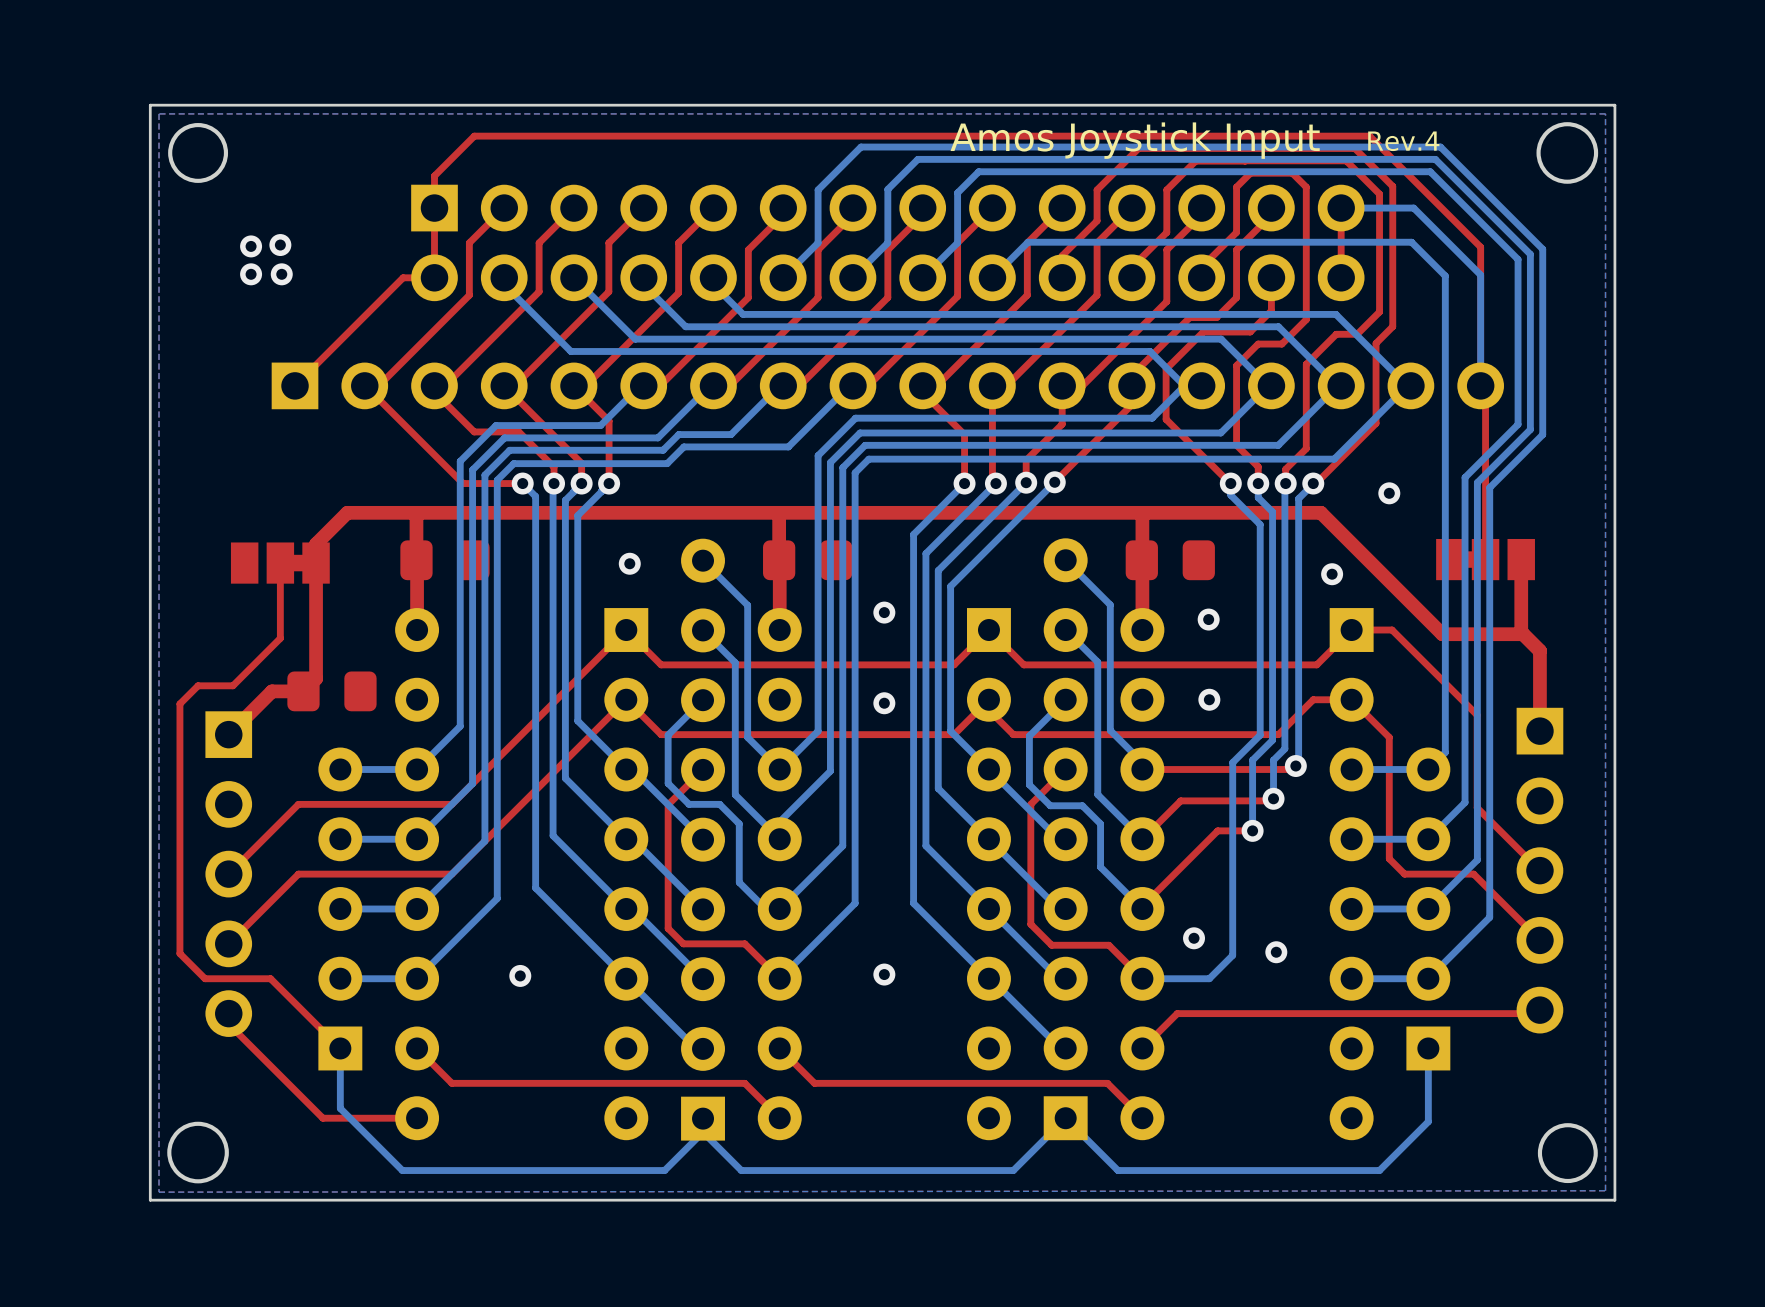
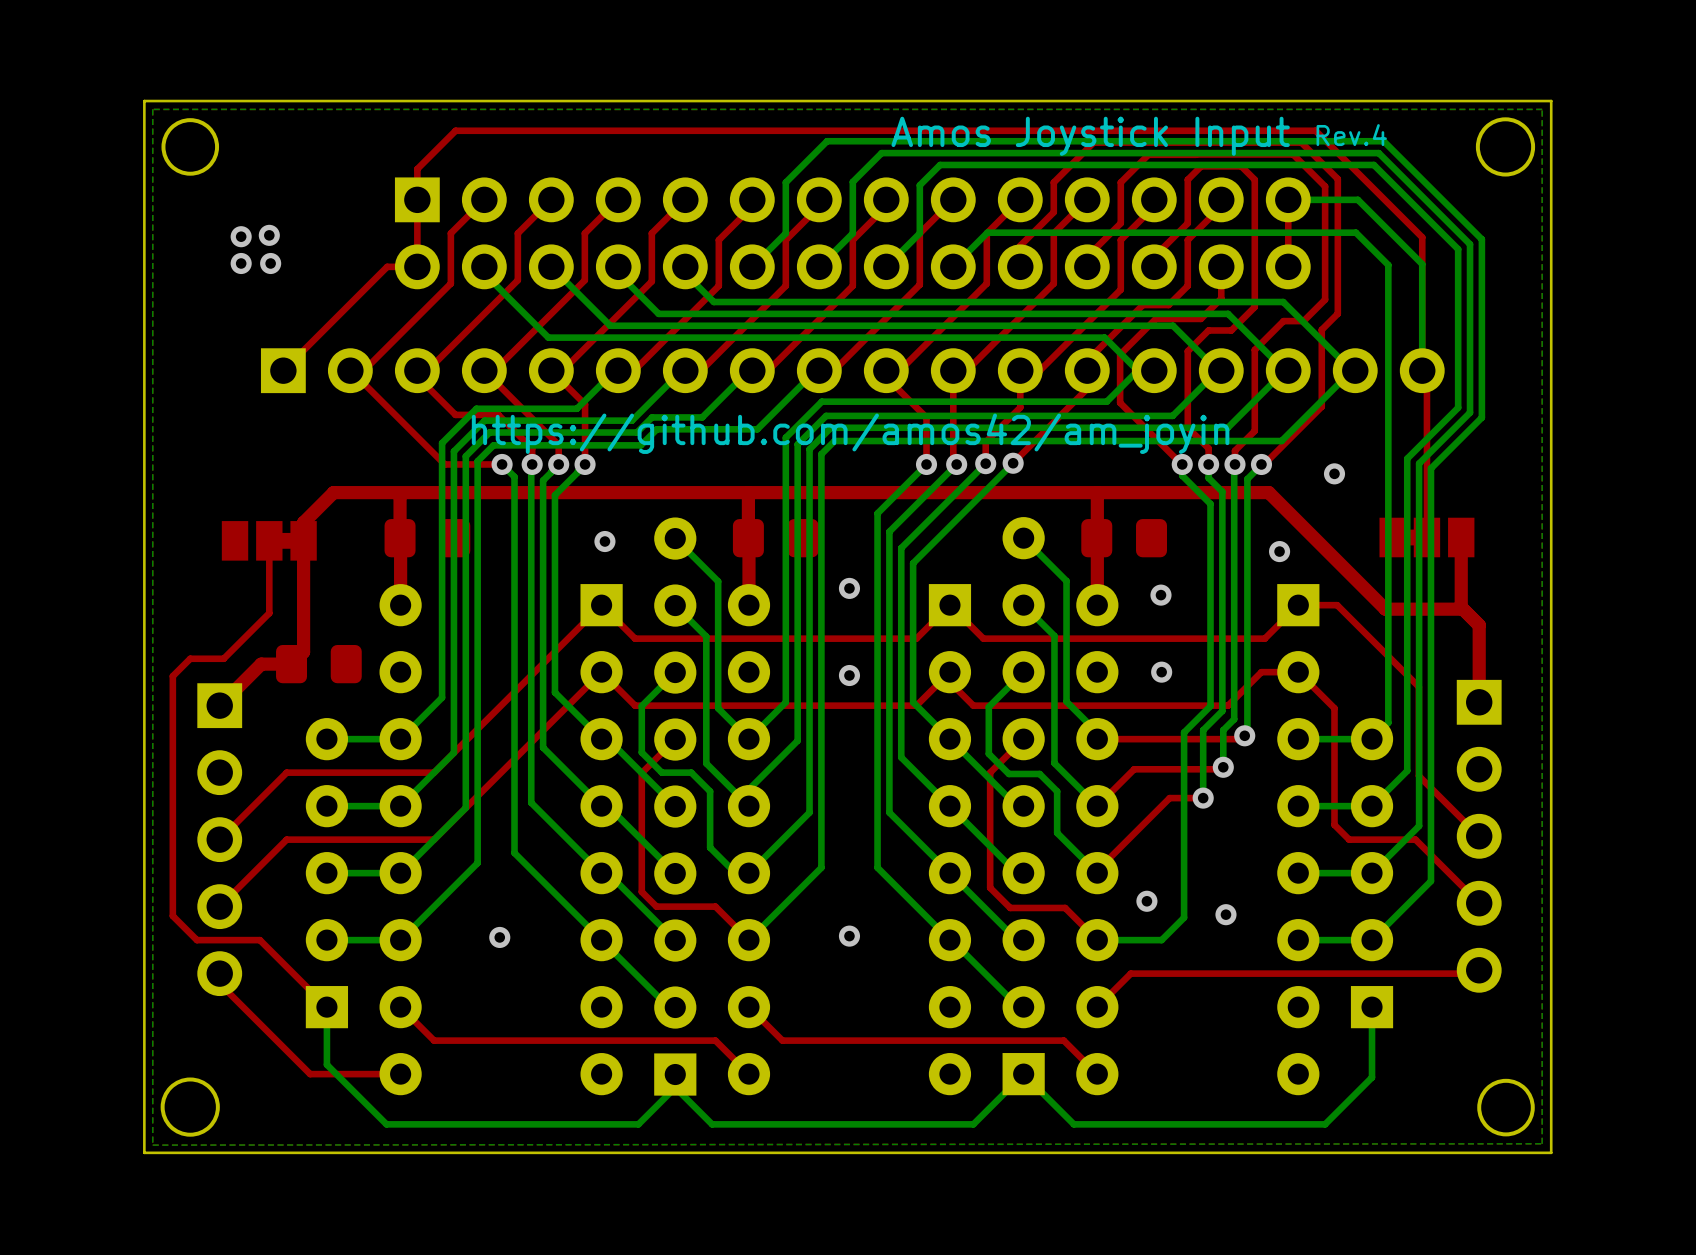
text: none -> https://github.com/amos42/am_joyin (850, 433)

